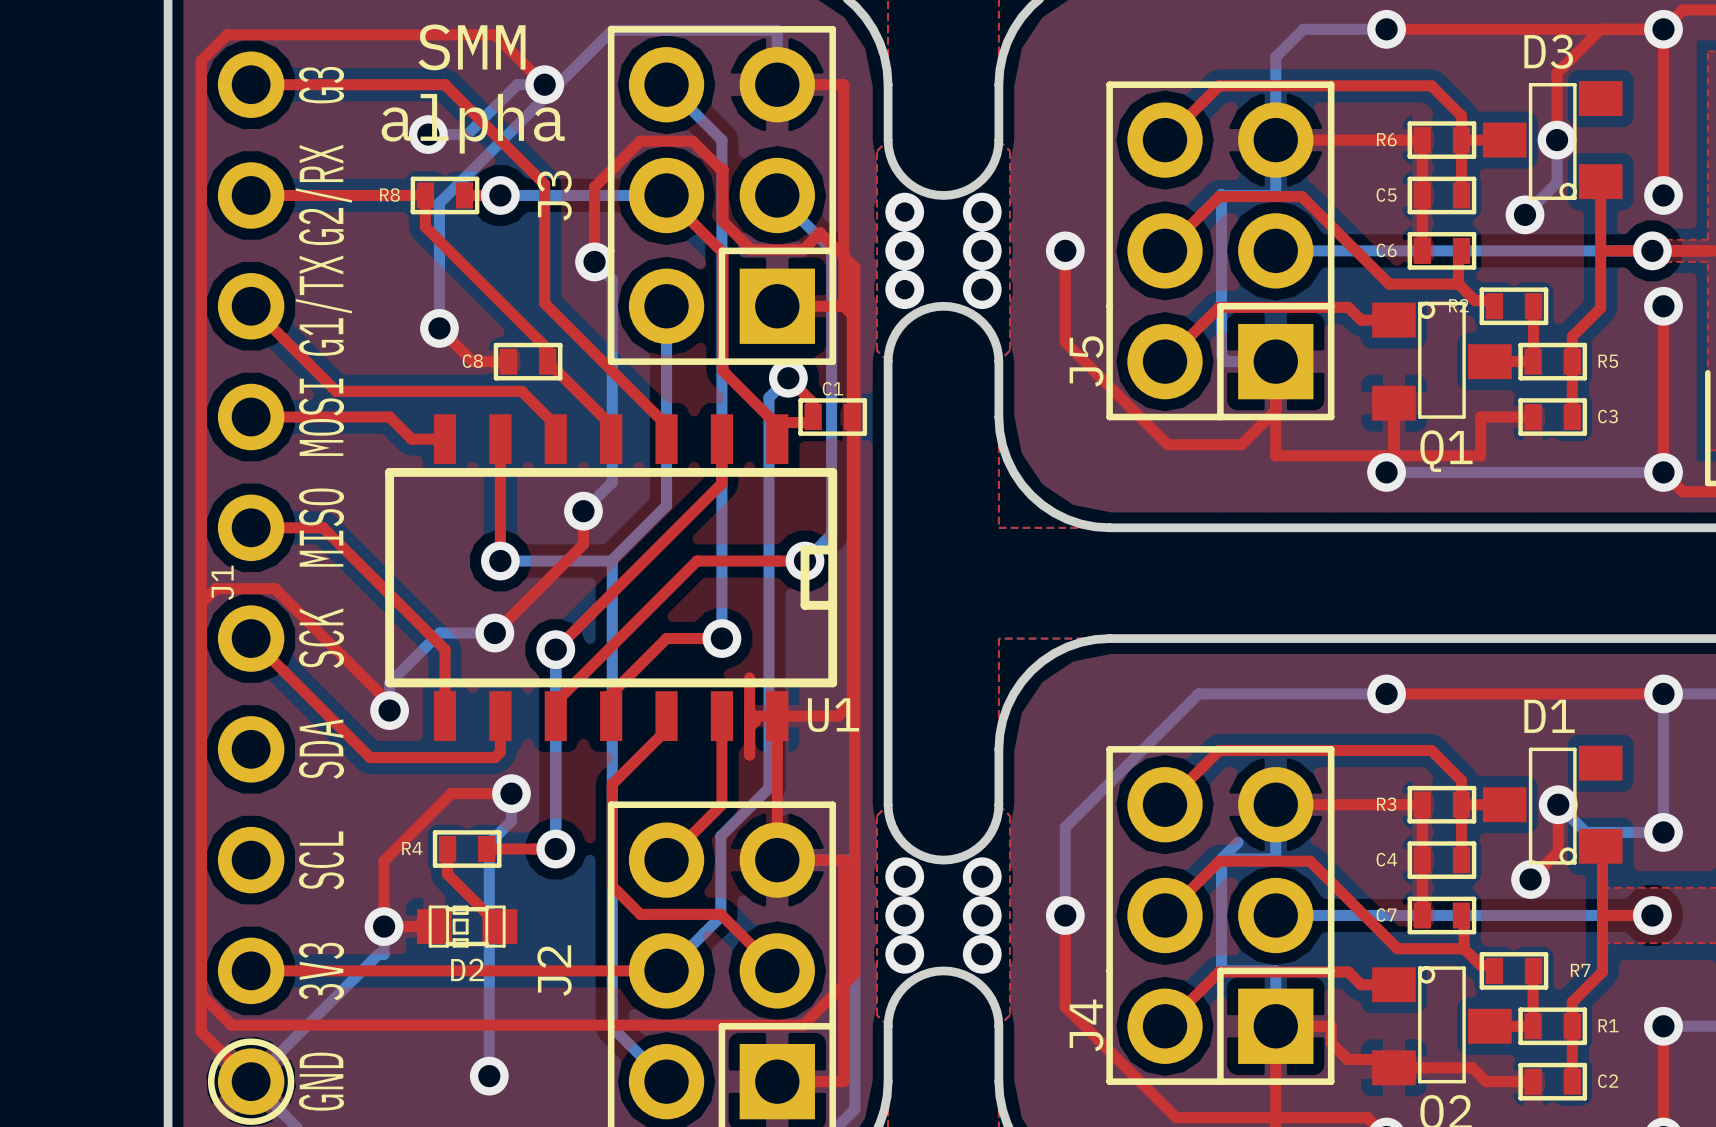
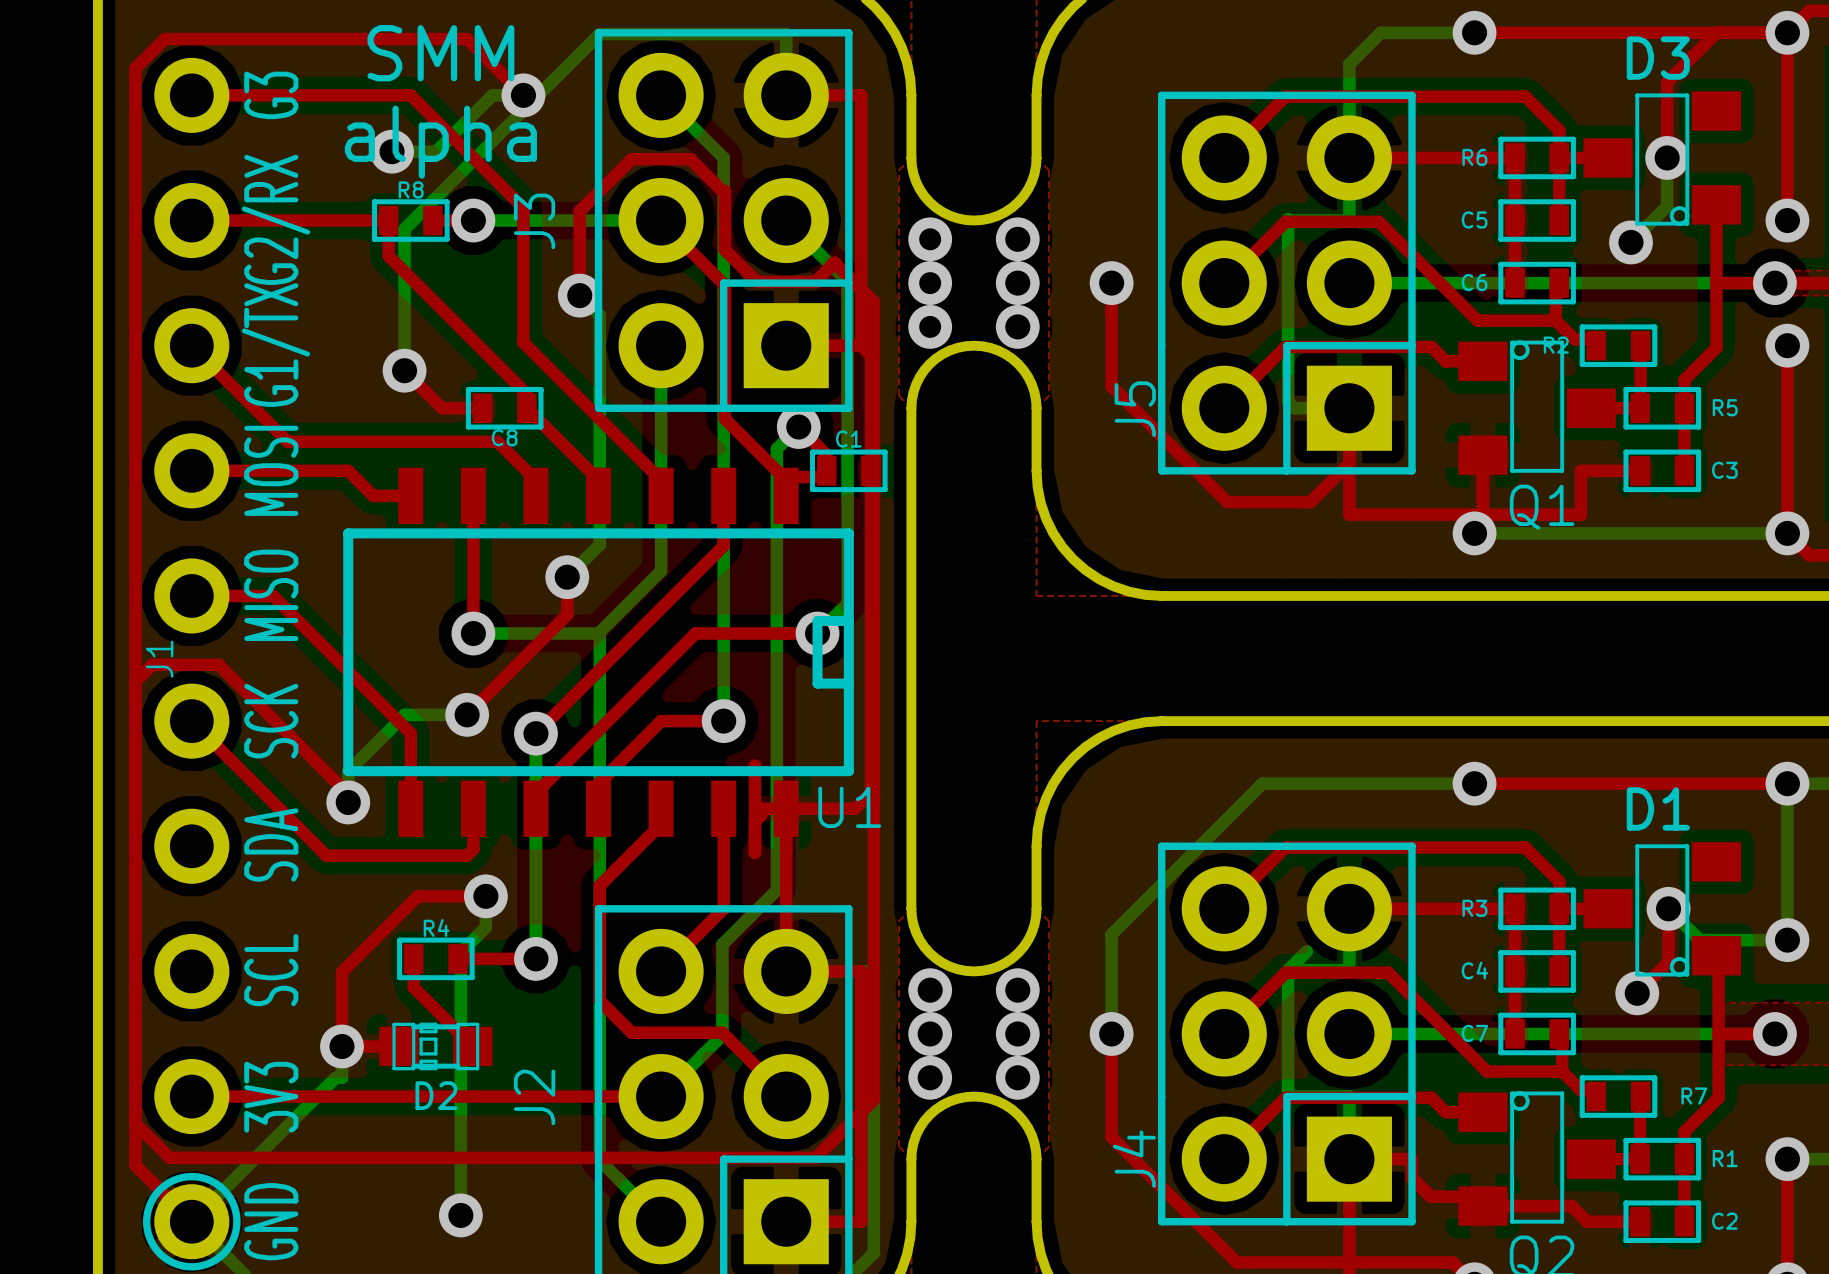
R8 name position: R8 (389, 194) -> R8 (411, 189)
C8 name position: C8 (472, 361) -> C8 (504, 437)
R4 name position: R4 (412, 848) -> R4 (436, 927)

